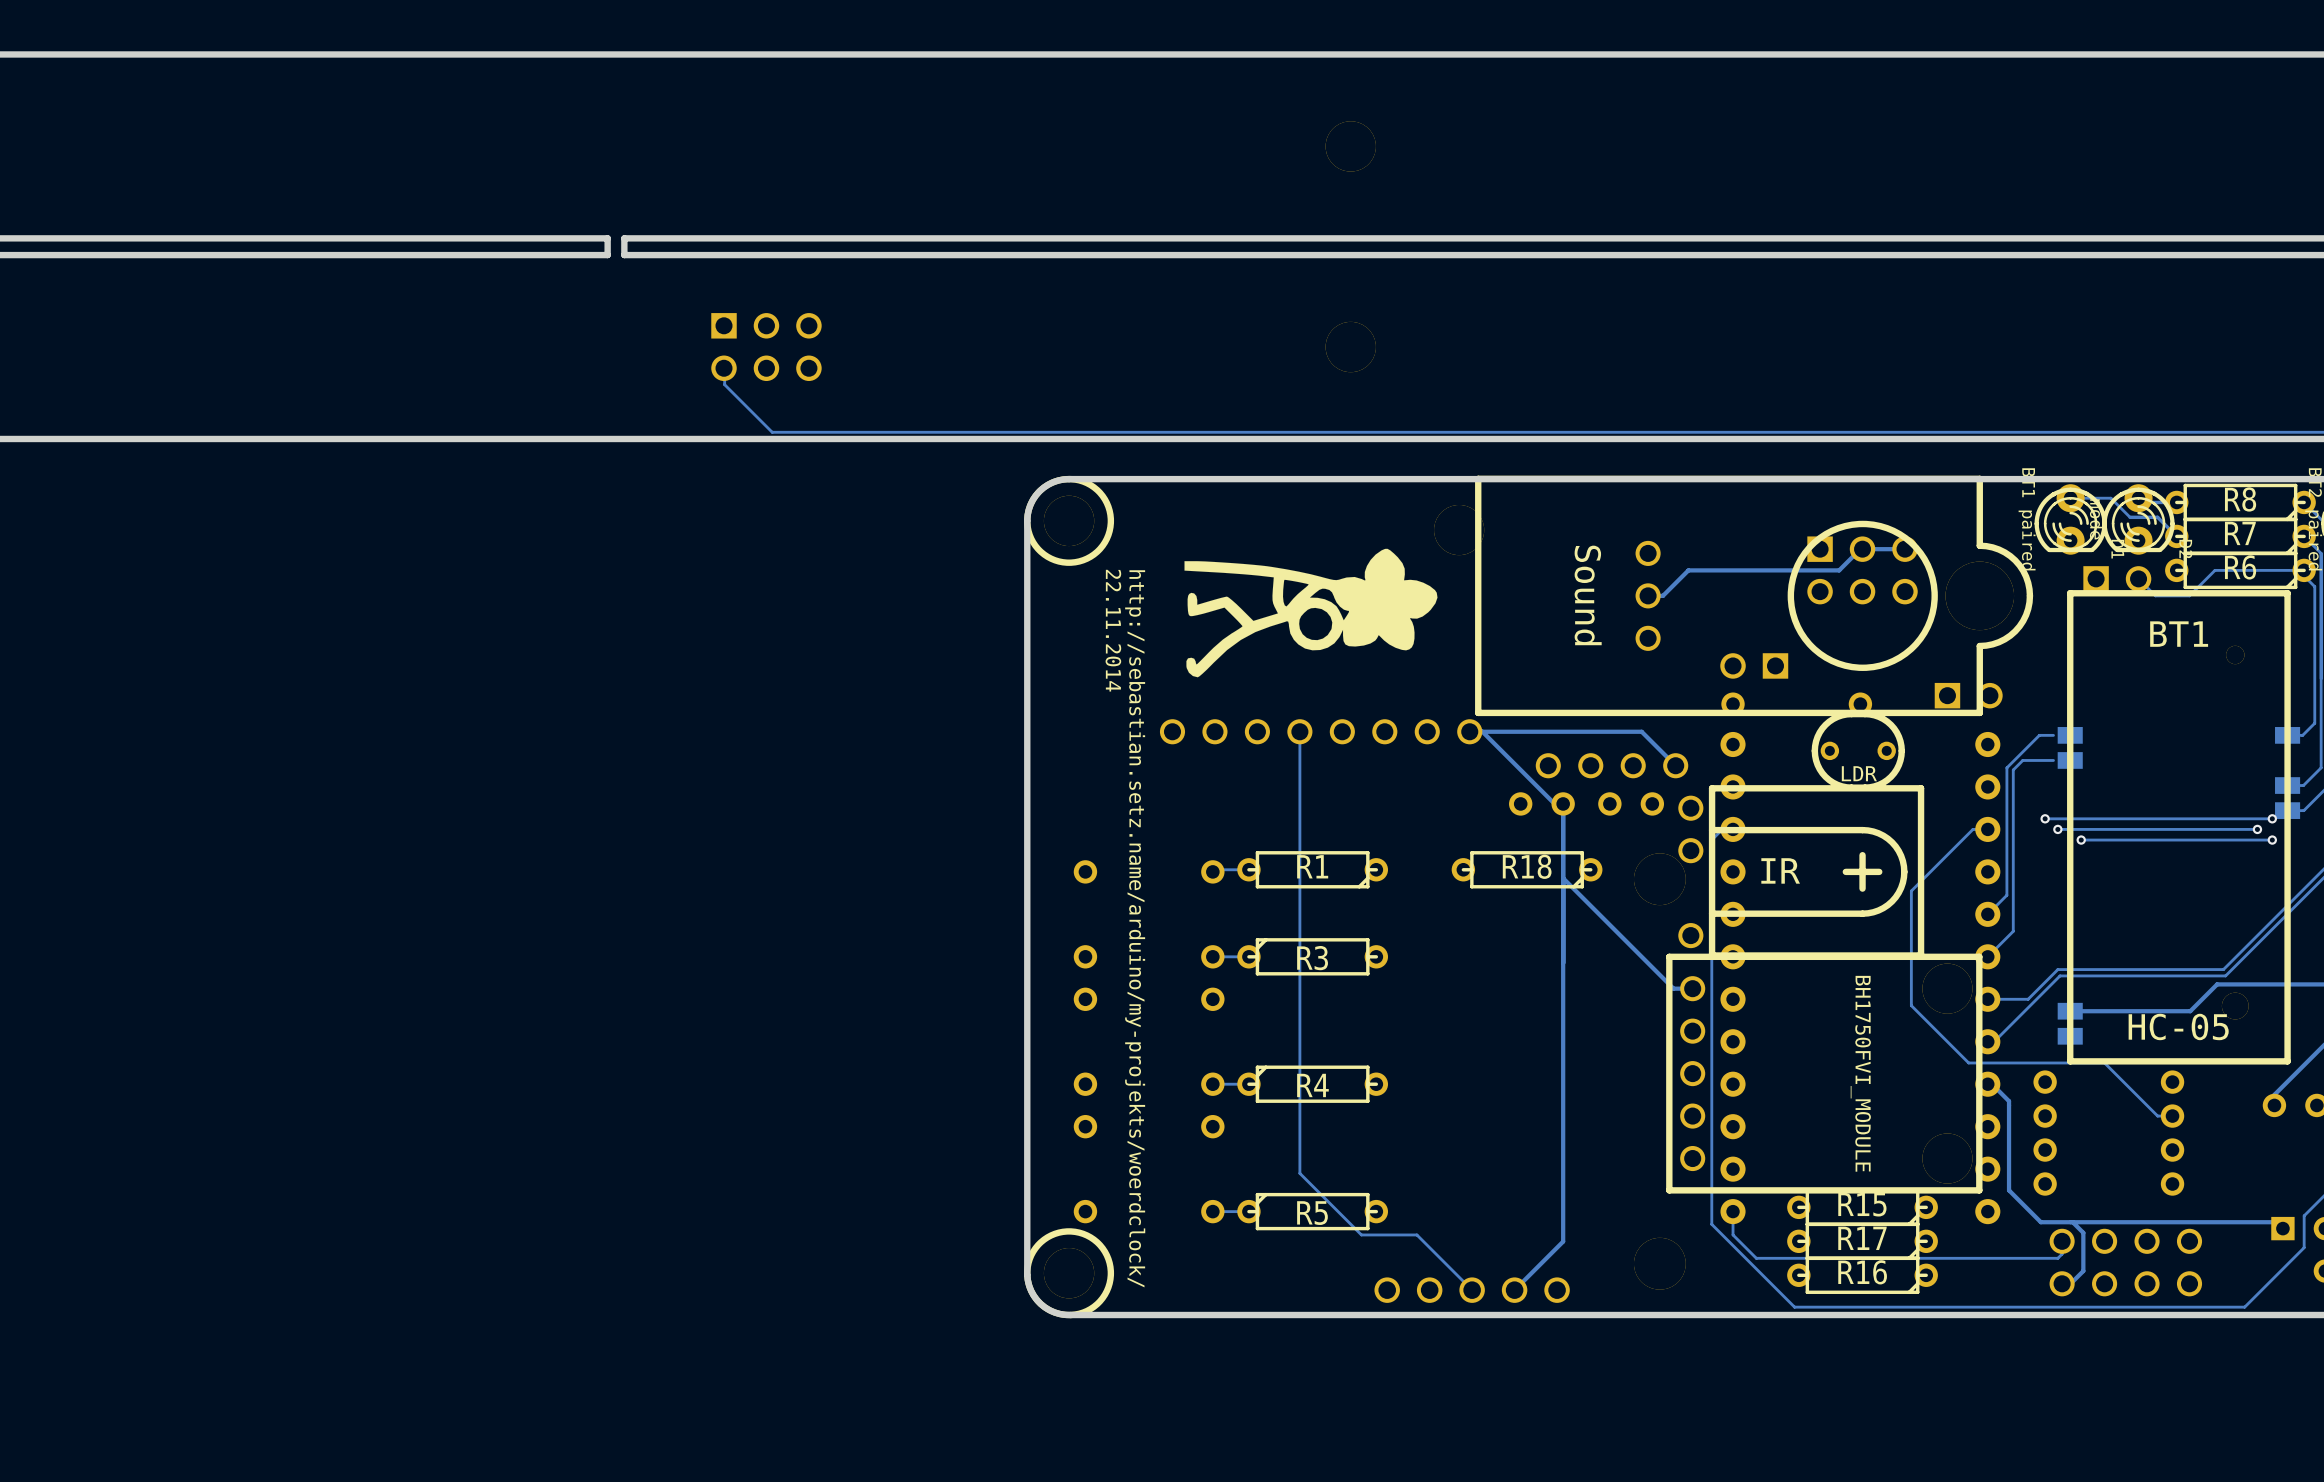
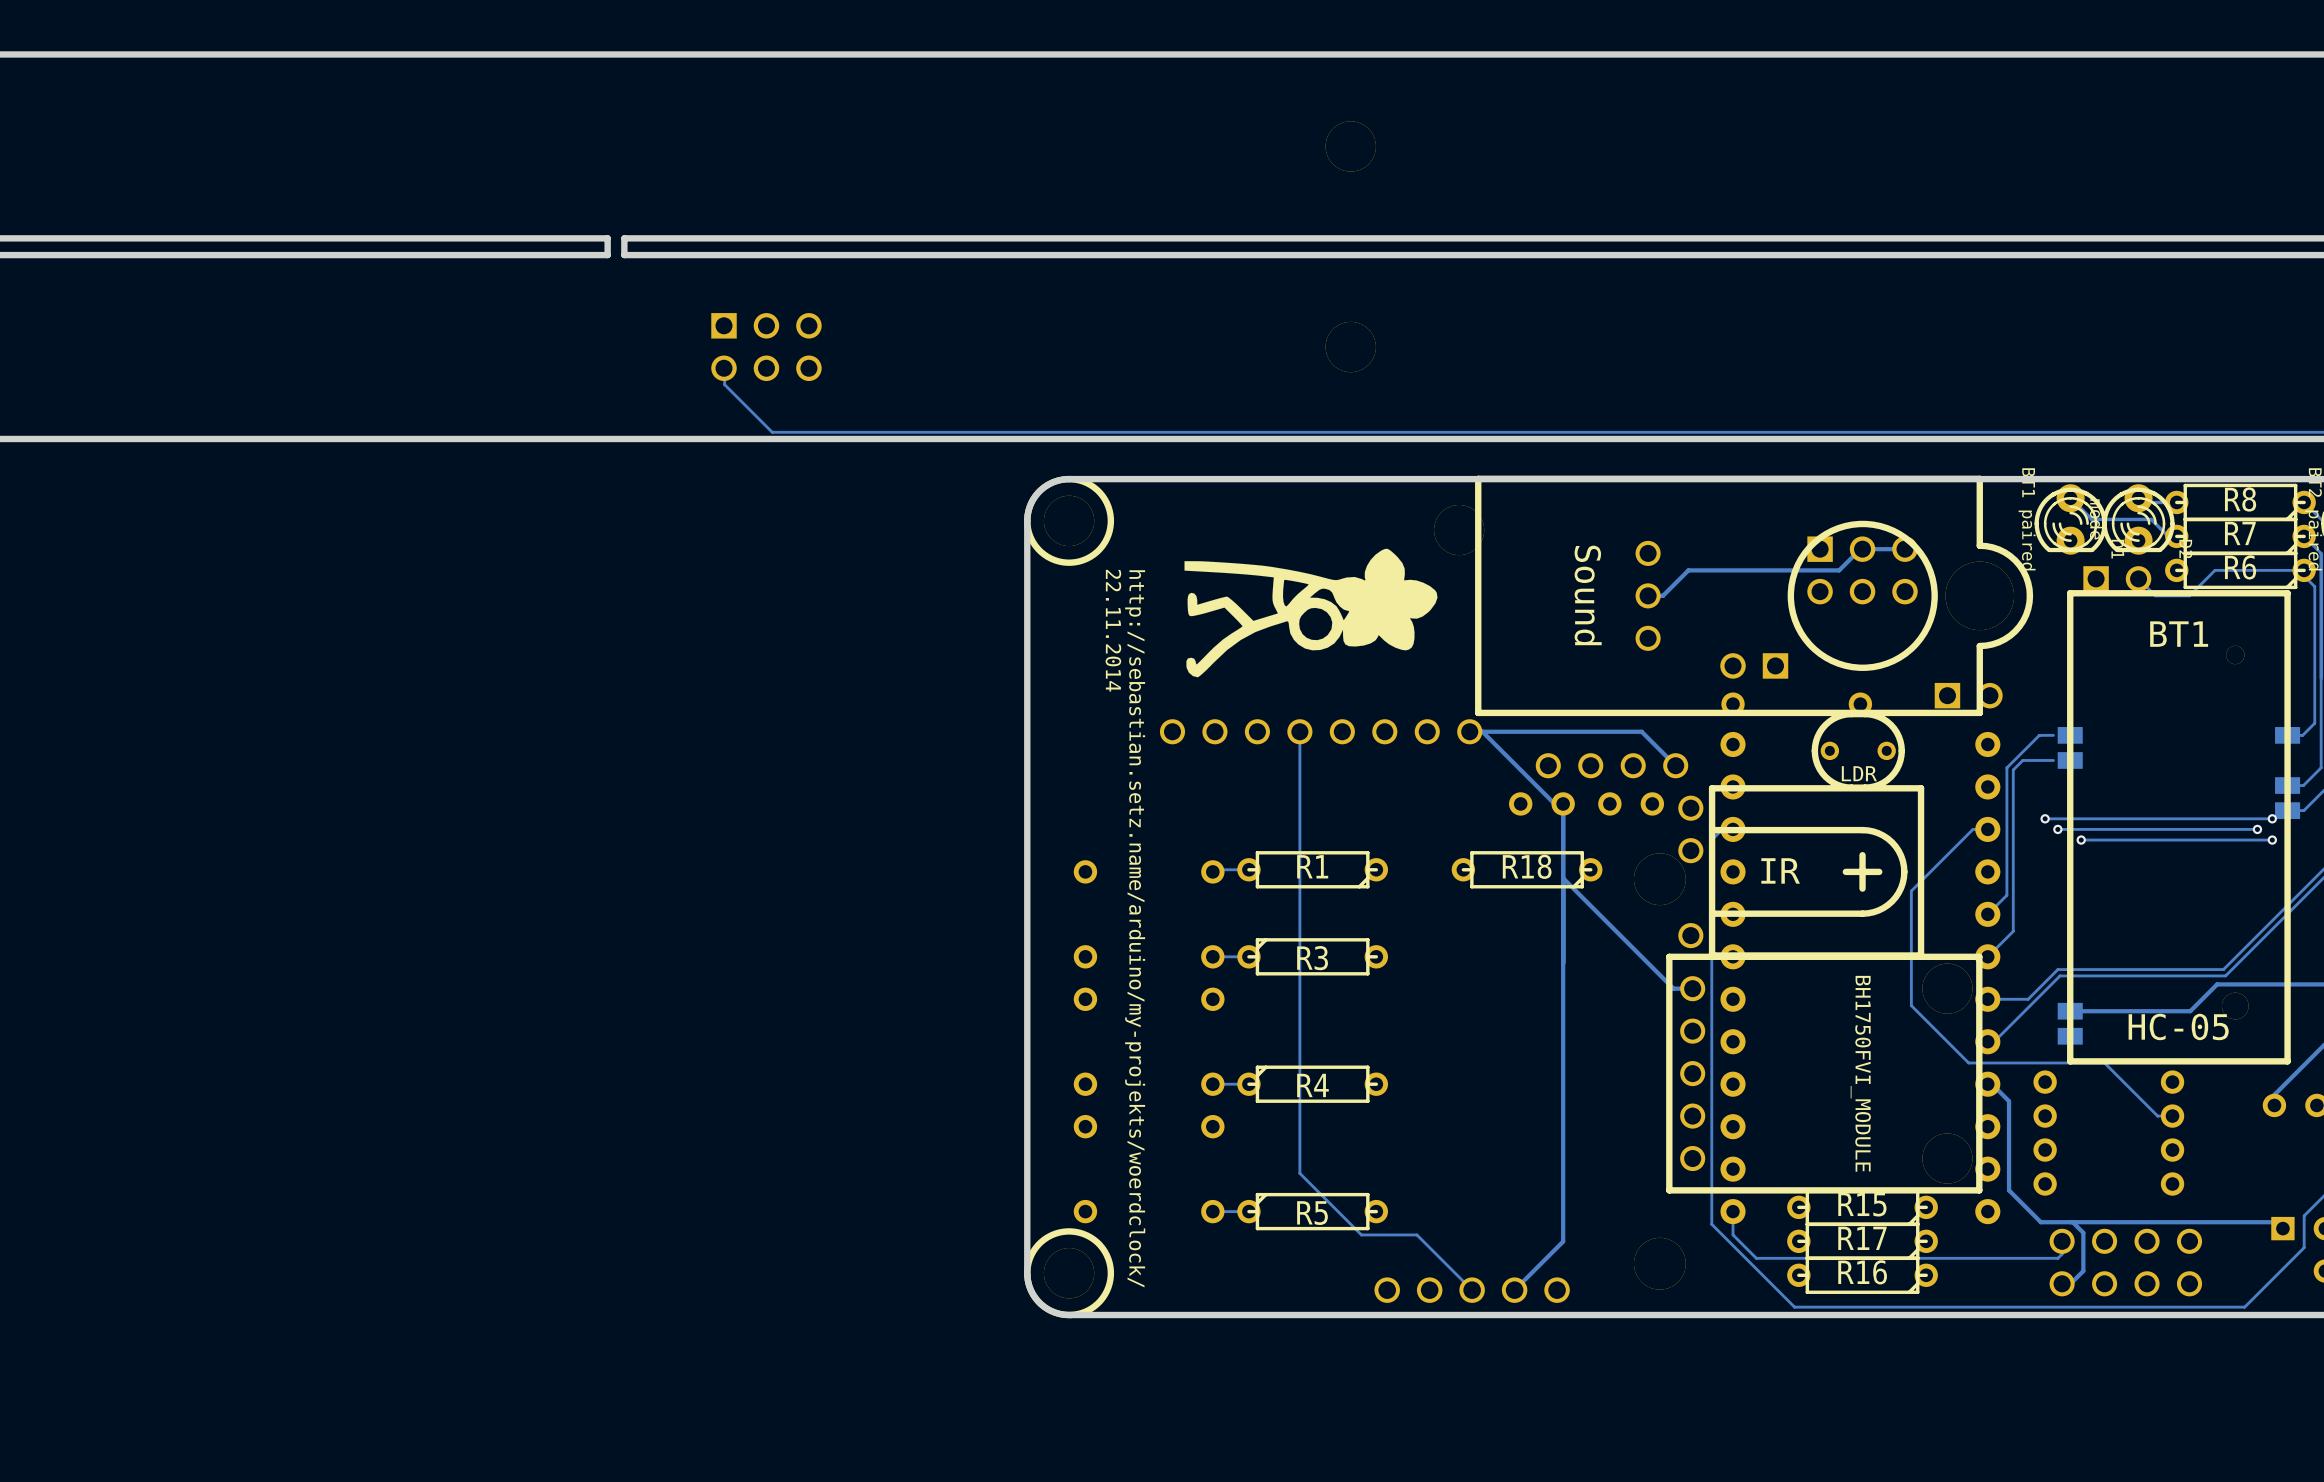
track: (2070, 498) (2110, 498) (2130, 517) (2157, 517) (2176, 536) -> (2070, 498) (2091, 519) (2151, 519) (2168, 536) (2176, 536)

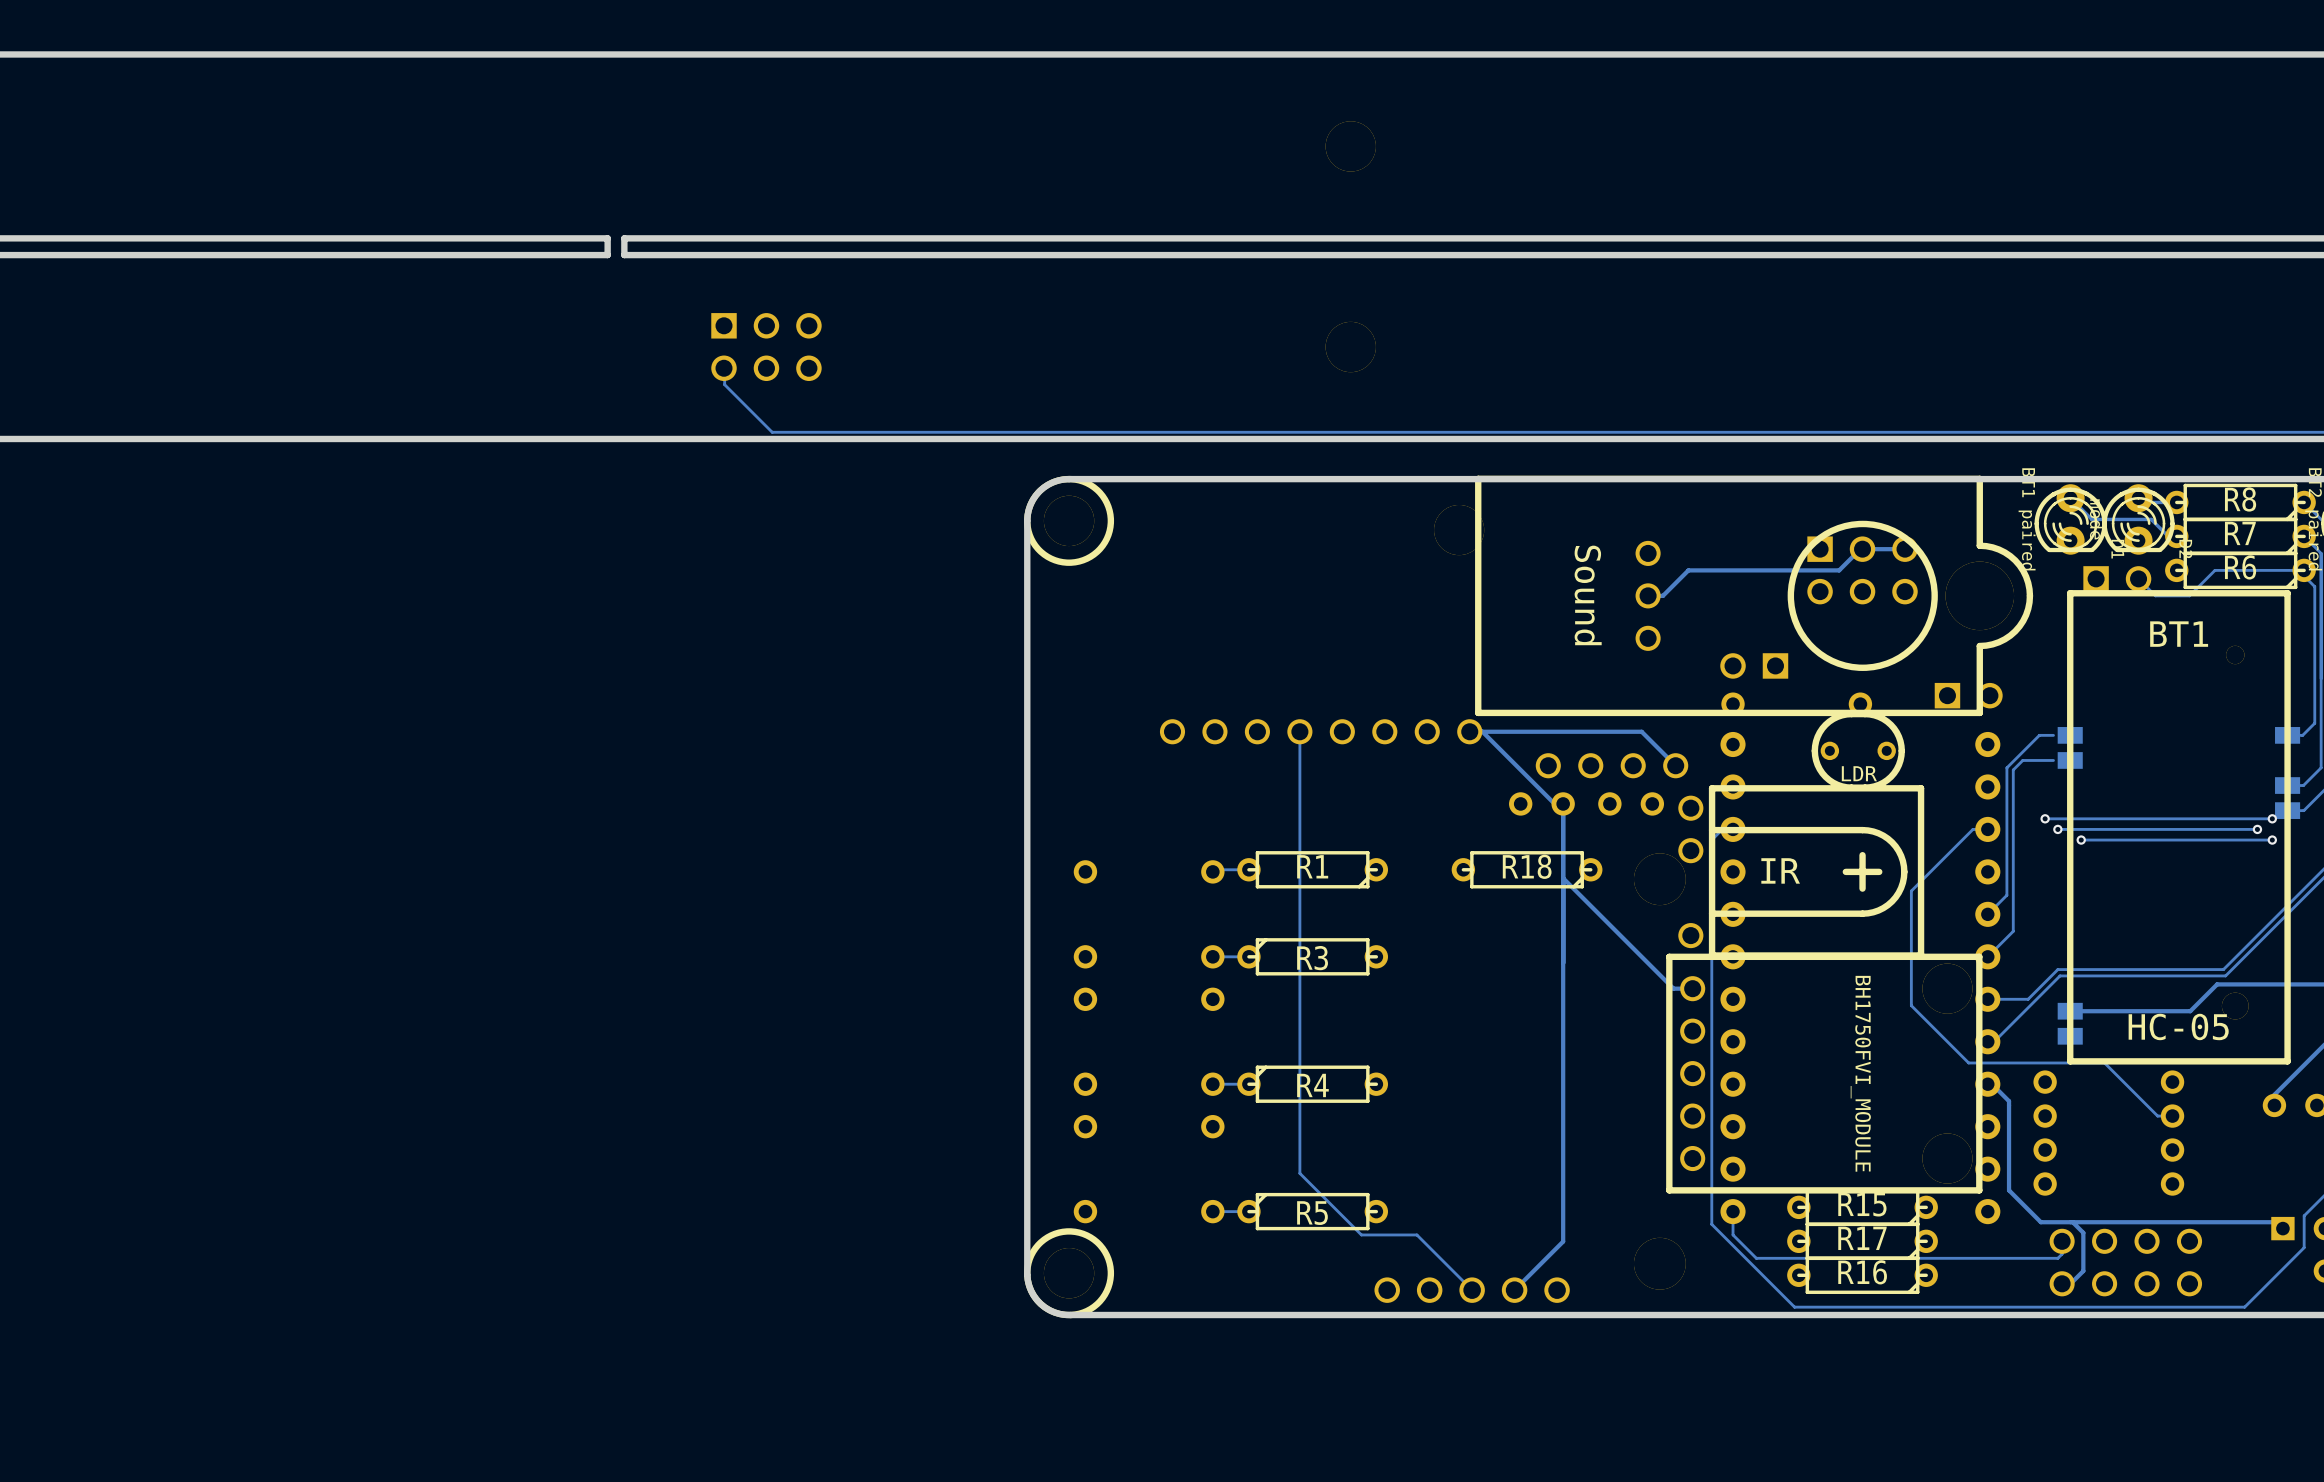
drawing: [1184, 548, 1438, 678] -> none
text: 22.11.2014 (1113, 630) -> none
text: http://sebastian.setz.name/arduino/my-projekts/woerdclock/ (1135, 928) -> none

